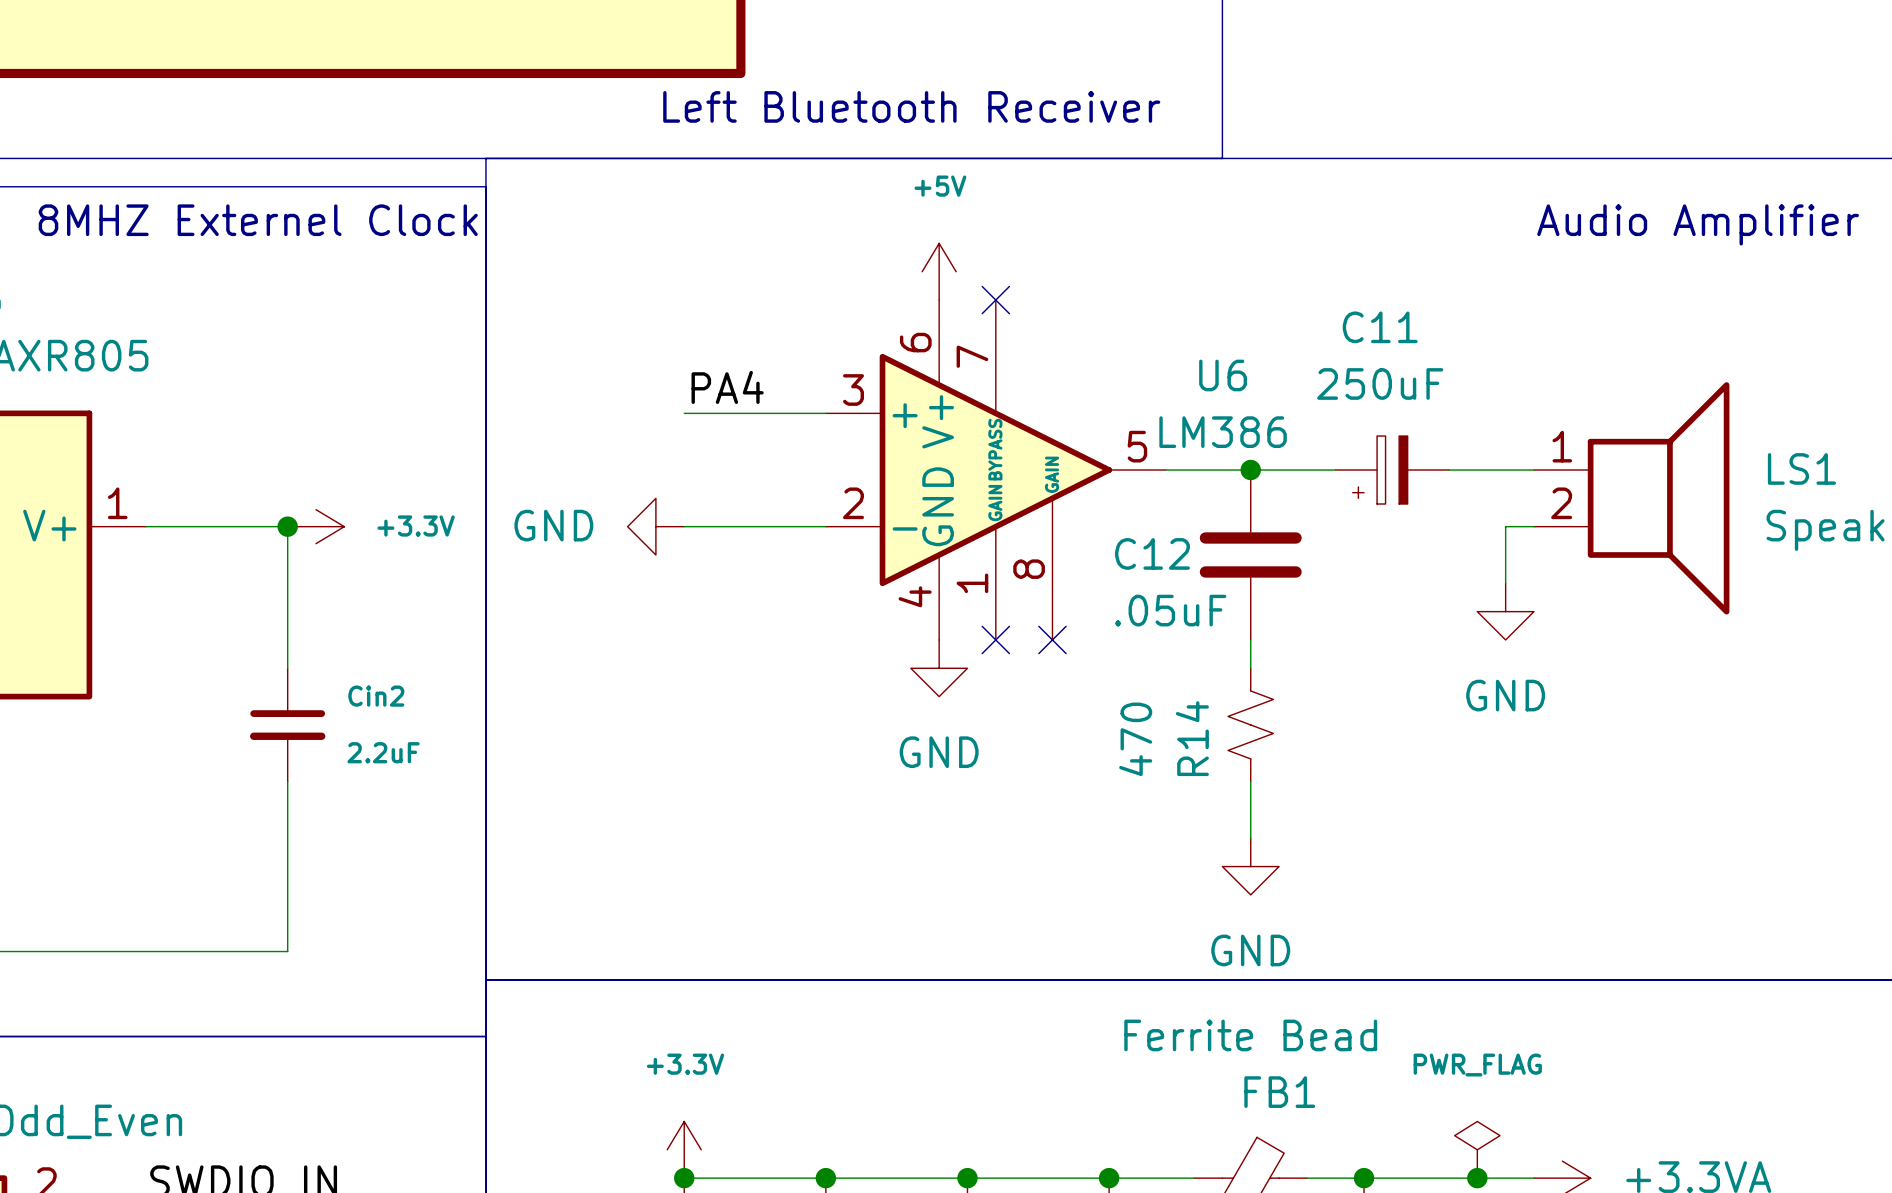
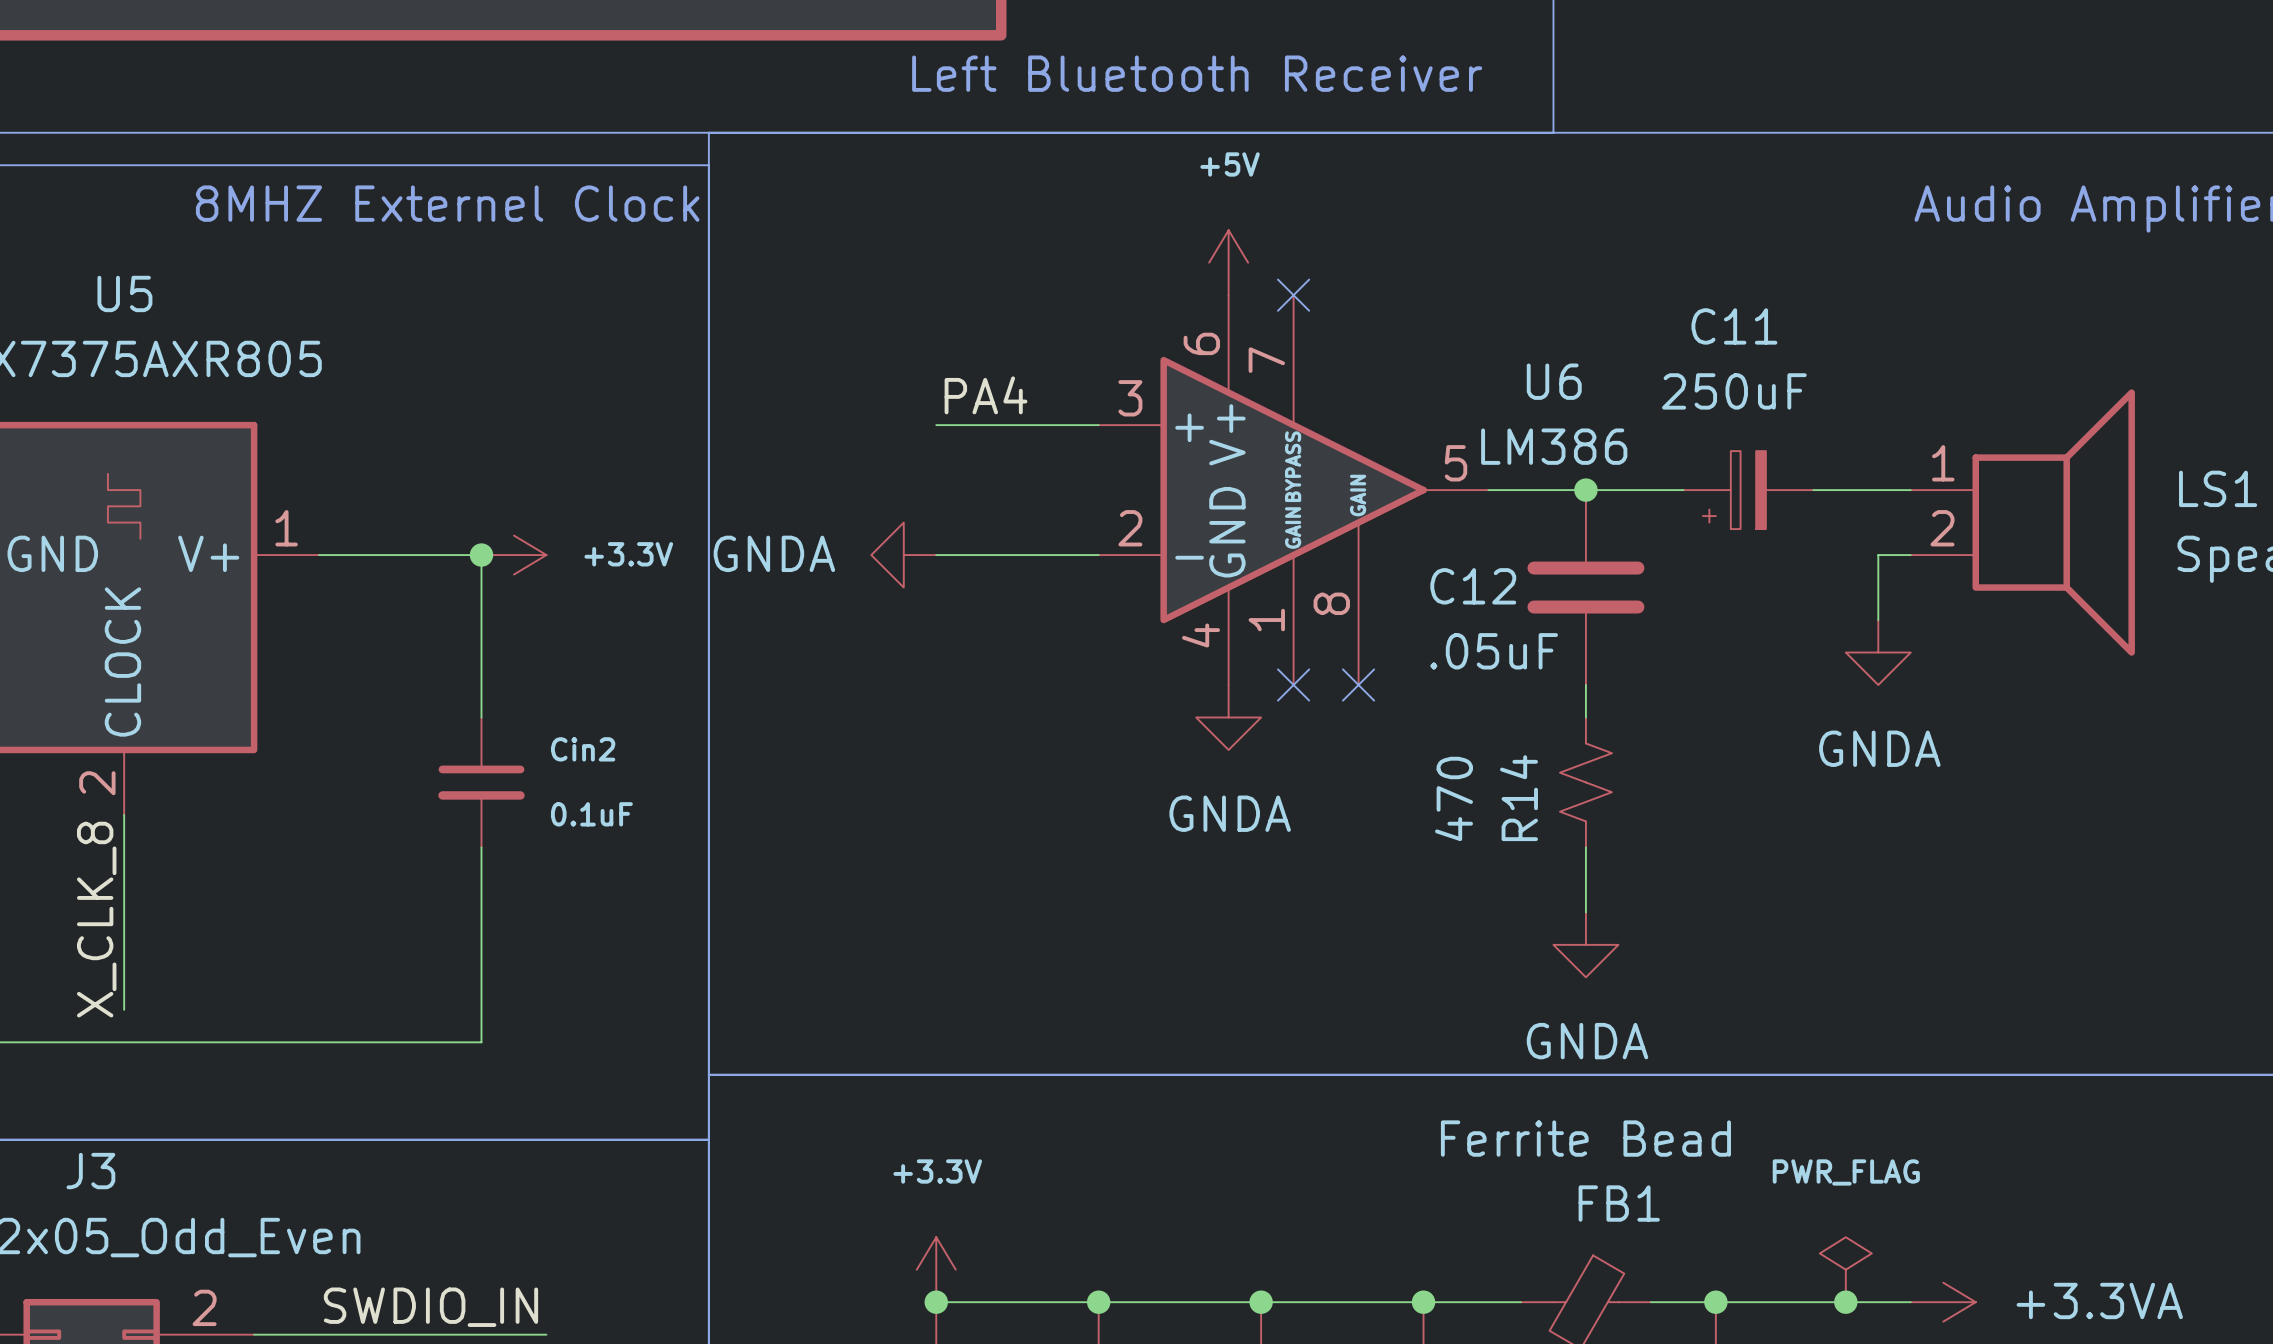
power symbol: GND (655, 526) -> GNDA (903, 555)
power symbol: GND (1505, 611) -> GNDA (1878, 652)
power symbol: GND (939, 668) -> GNDA (1228, 717)
Cin2 value: 2.2uF (383, 752) -> 0.1uF (591, 814)
power symbol: GND (1250, 866) -> GNDA (1585, 944)

